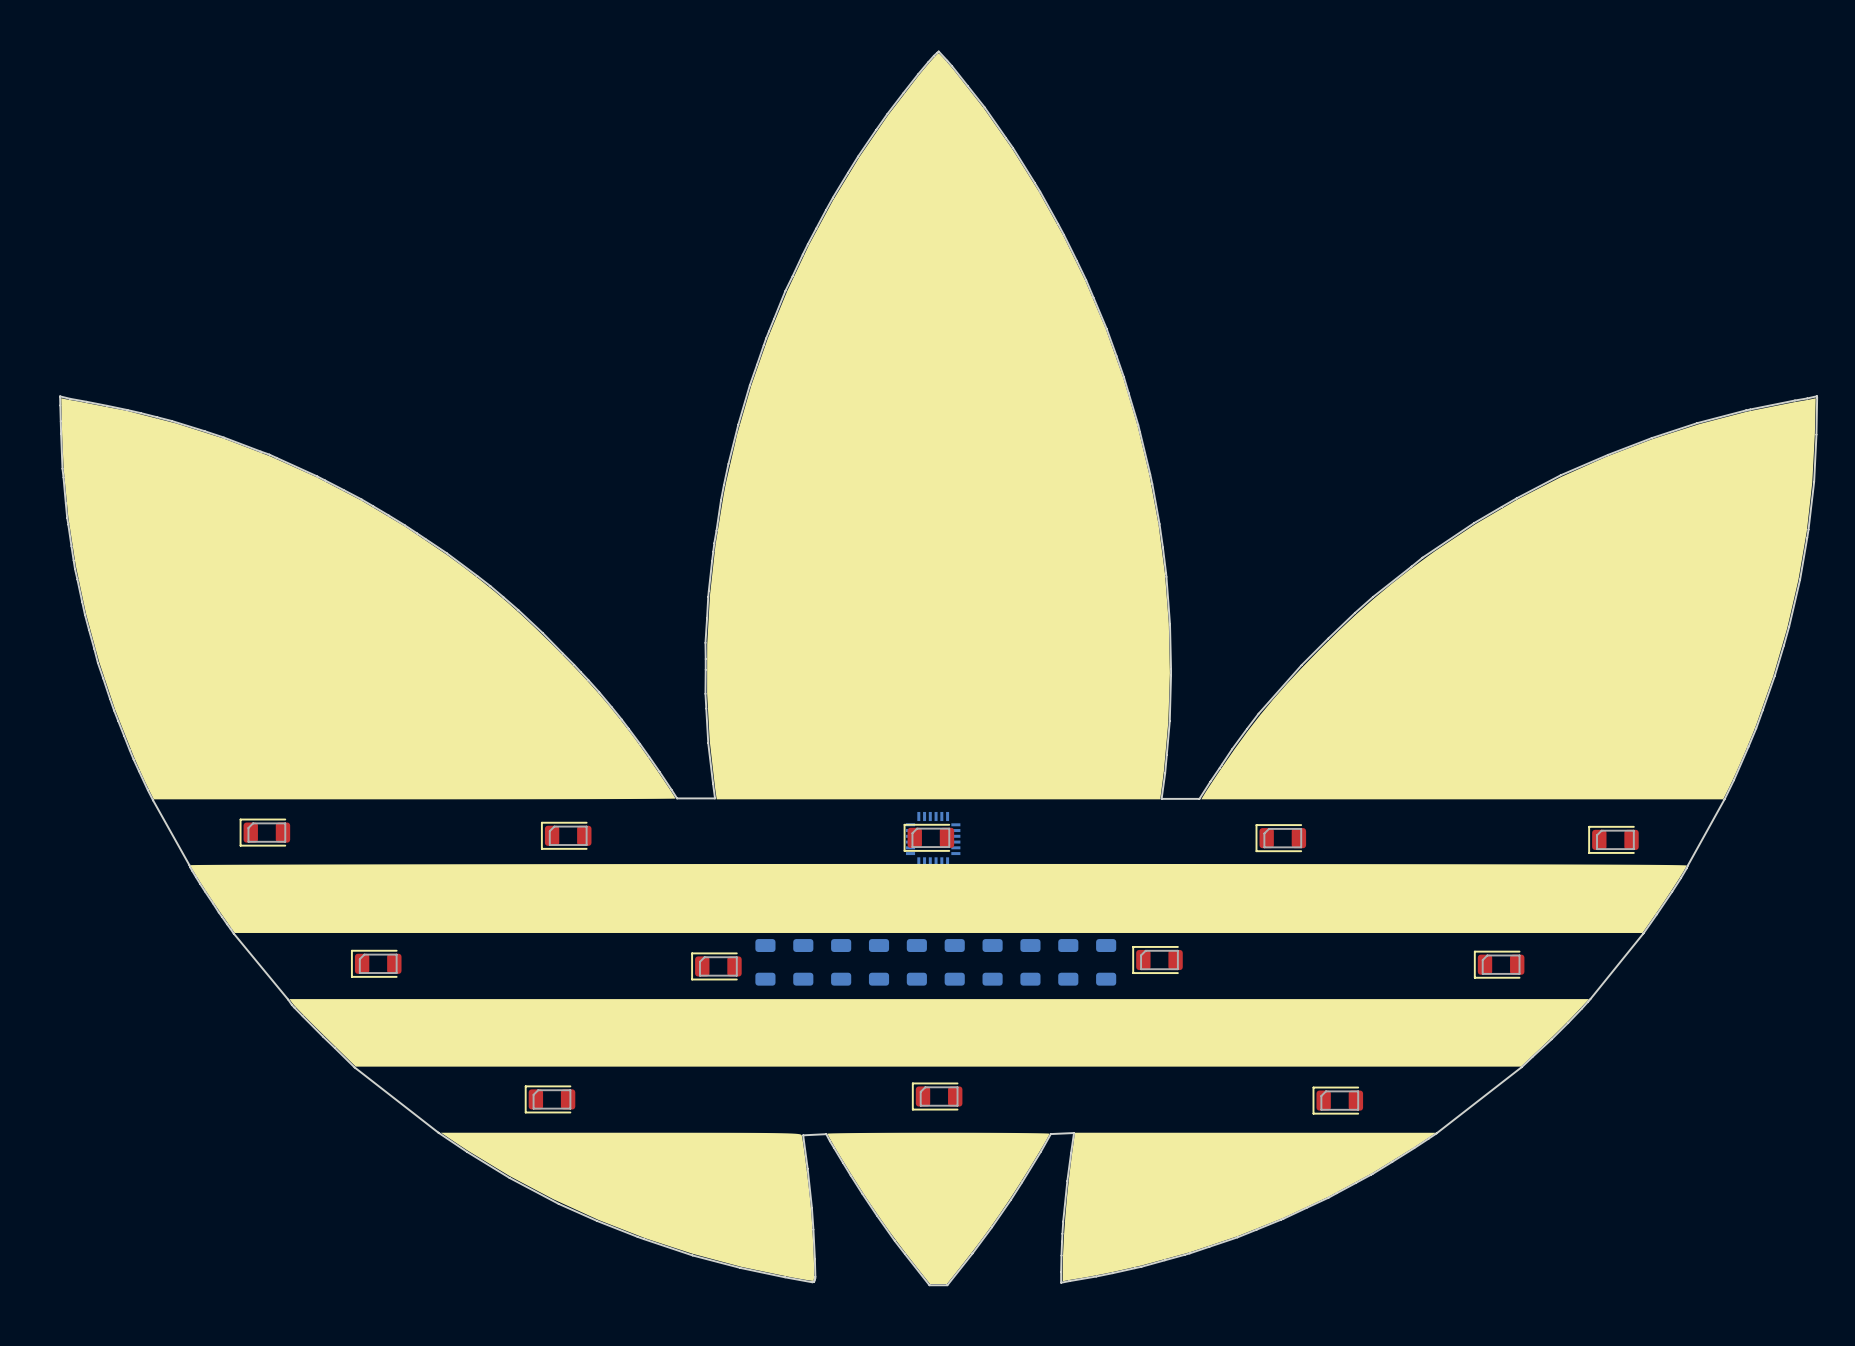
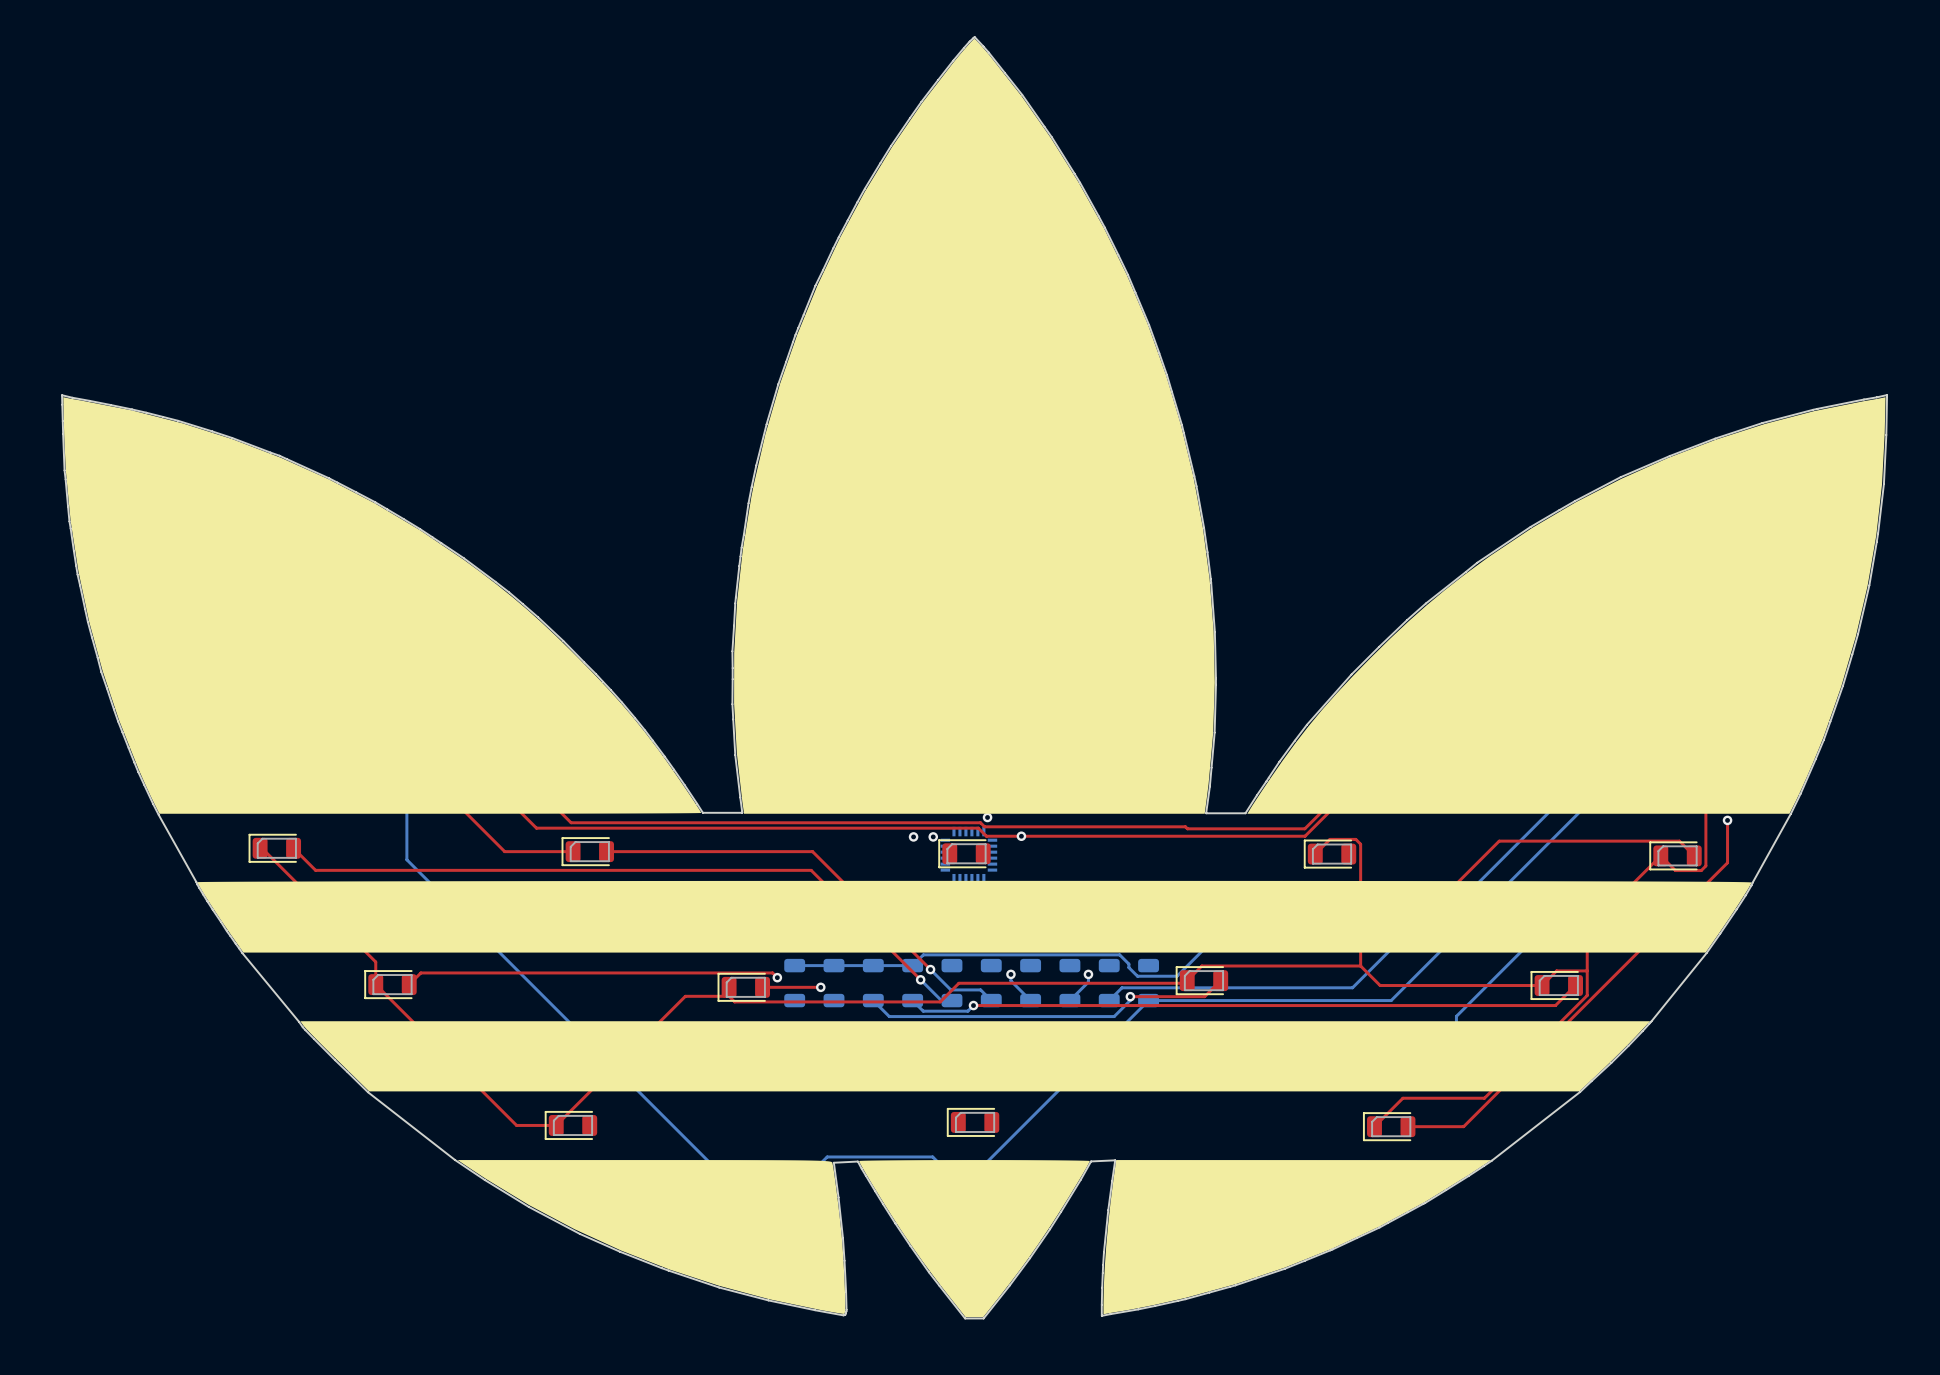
bottom track: none -> (1664, 632) (1664, 639) (1654, 648) (1656, 704) (1460, 900) (1252, 900) (1177, 976) (1137, 976) (1119, 954) (923, 954) (912, 965) (794, 965)
bottom track: none -> (1679, 632) (1679, 626) (1689, 616) (1699, 616) (1702, 618) (1702, 660) (1686, 675) (1686, 704) (1391, 1000) (1148, 1000) (985, 1163) (970, 1163) (970, 1179) (954, 1179) (932, 1156) (827, 1156) (786, 1197) (744, 1197) (406, 859) (406, 733)
top track: none -> (1705, 723) (1705, 865) (1701, 870) (1675, 870) (1660, 855) (1587, 929) (1587, 995) (1484, 1098) (1402, 1098) (1374, 1126)
top track: none -> (1690, 730) (1402, 730) (1304, 828) (984, 826) (980, 822) (571, 822) (481, 733) (467, 733)
top track: none -> (386, 733) (504, 851) (573, 851)
top track: none -> (437, 733) (451, 733) (451, 742) (536, 828) (978, 828) (986, 836) (1305, 836) (1395, 745) (1660, 745)
via: none -> (987, 817)
top track: none -> (1727, 820) (1727, 862) (1463, 1126) (1407, 1126)
via: none -> (1727, 820)
via: none -> (1021, 836)
via: none -> (913, 836)
via: none -> (933, 836)
top track: none -> (260, 848) (375, 962) (375, 984) (516, 1125) (556, 1125) (685, 996) (729, 996)
top track: none -> (293, 848) (315, 870) (811, 870) (920, 979)
top track: none -> (606, 851) (812, 851) (930, 969)
top track: none -> (1315, 854) (1329, 839) (1355, 839) (1360, 844) (1360, 966)
top track: none -> (1694, 855) (1679, 841) (1499, 841) (1406, 933)
bottom track: none -> (1543, 929) (1456, 1016) (1456, 1040)
bottom track: none -> (1406, 933) (1352, 987) (1121, 987) (1109, 1000)
top track: none -> (1360, 966) (1380, 985) (1542, 985) (1556, 970) (1587, 970)
top track: none -> (1360, 966) (1201, 966) (1184, 983) (958, 983) (940, 1001) (734, 1001) (729, 996)
bottom track: none -> (930, 969) (950, 989) (980, 989) (991, 1000)
via: none -> (930, 969)
bottom track: none -> (1010, 974) (1010, 980) (1030, 1000)
via: none -> (1010, 974)
bottom track: none -> (1088, 974) (1088, 982) (1069, 1000)
via: none -> (1088, 974)
top track: none -> (777, 977) (772, 972) (420, 972) (409, 984)
via: none -> (777, 977)
bottom track: none -> (920, 979) (941, 1000) (951, 1000)
via: none -> (920, 979)
top track: none -> (1220, 980) (1204, 996) (1130, 996)
top track: none -> (1575, 985) (1555, 1005) (973, 1005)
top track: none -> (762, 987) (820, 987)
via: none -> (820, 987)
bottom track: none -> (1130, 996) (1130, 1000) (1114, 1016) (889, 1016) (873, 1000)
via: none -> (1130, 996)
bottom track: none -> (912, 1000) (923, 1011) (967, 1011) (973, 1005)
via: none -> (973, 1005)

